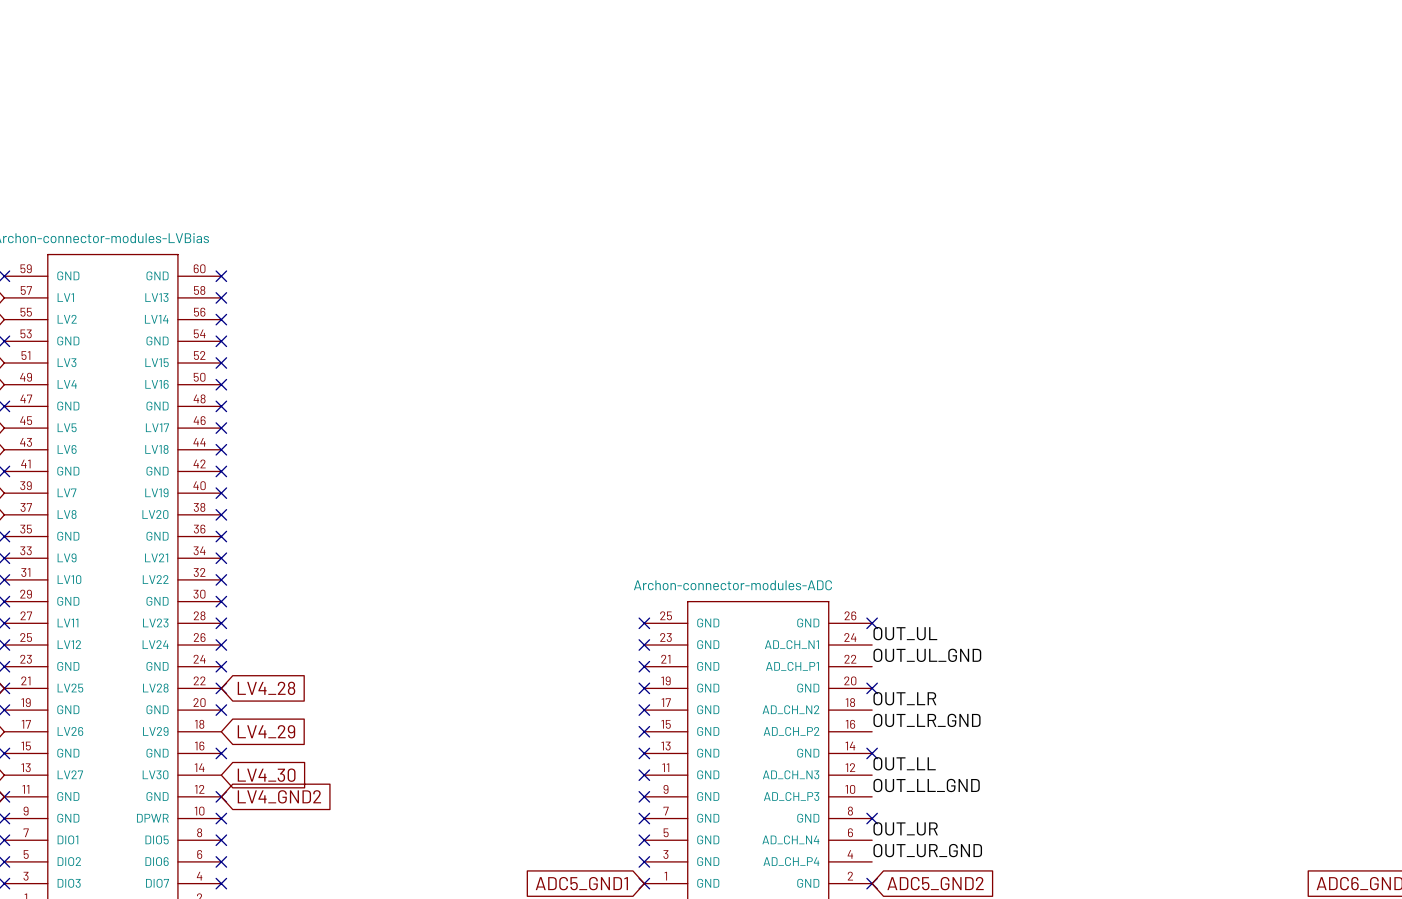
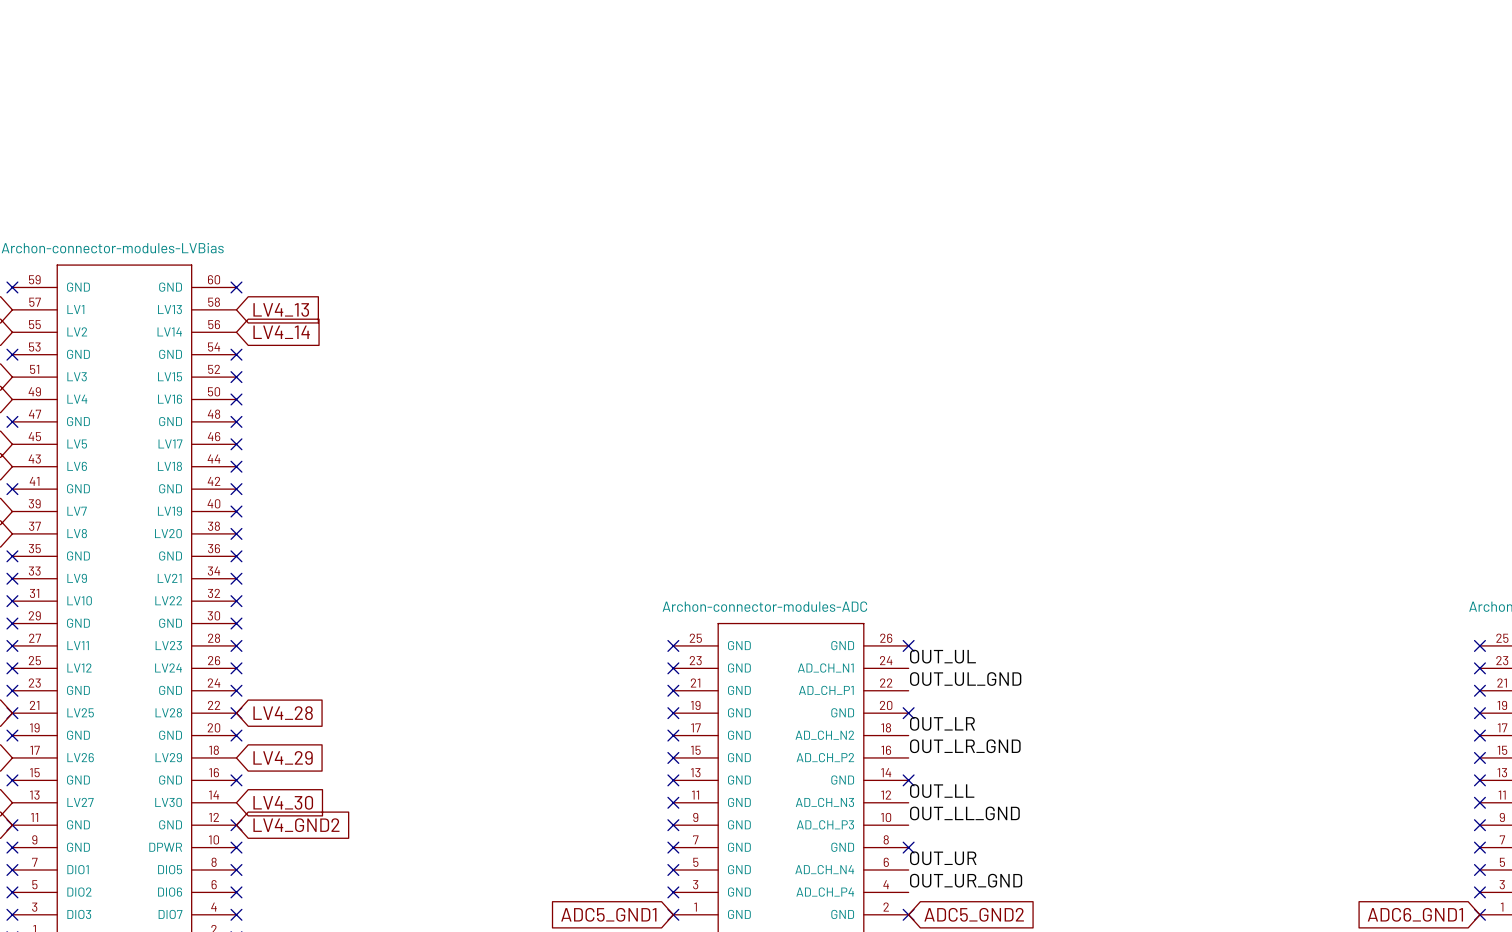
no-connect mark: (221, 297) -> none
global label: none -> LV4_13 (281, 309)
no-connect mark: (221, 319) -> none
global label: none -> LV4_14 (281, 332)

